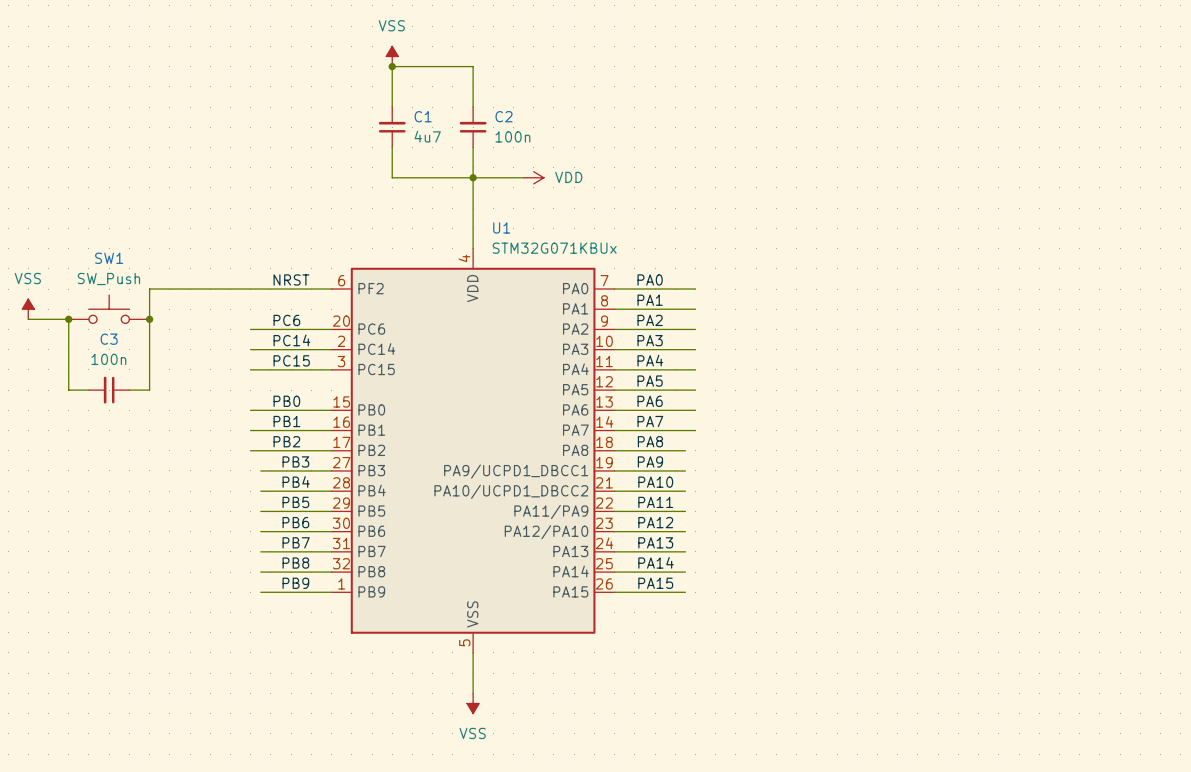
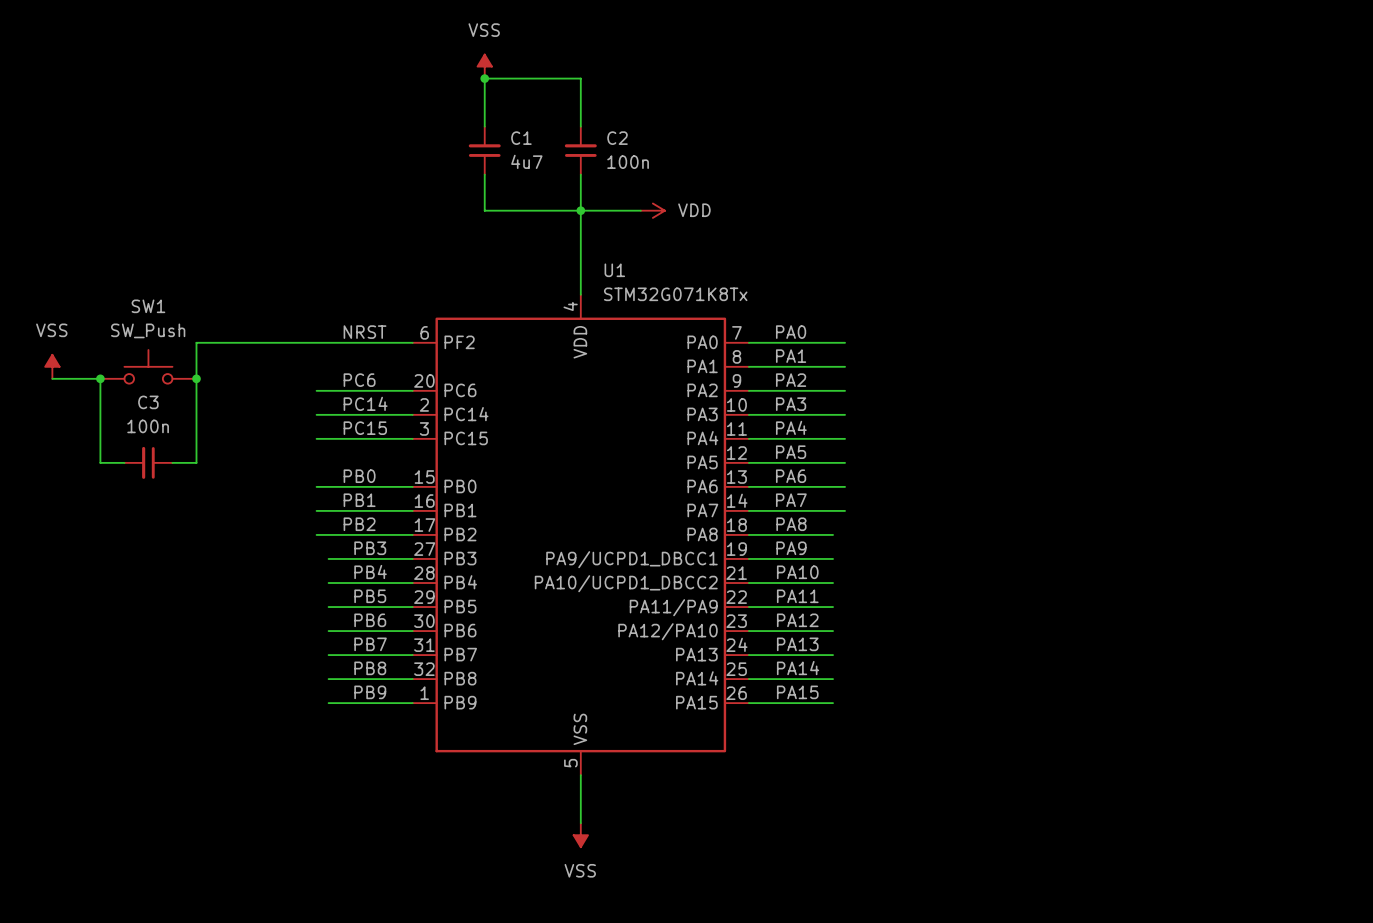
U1 value: STM32G071KBUx (554, 248) -> STM32G071K8Tx (675, 294)

